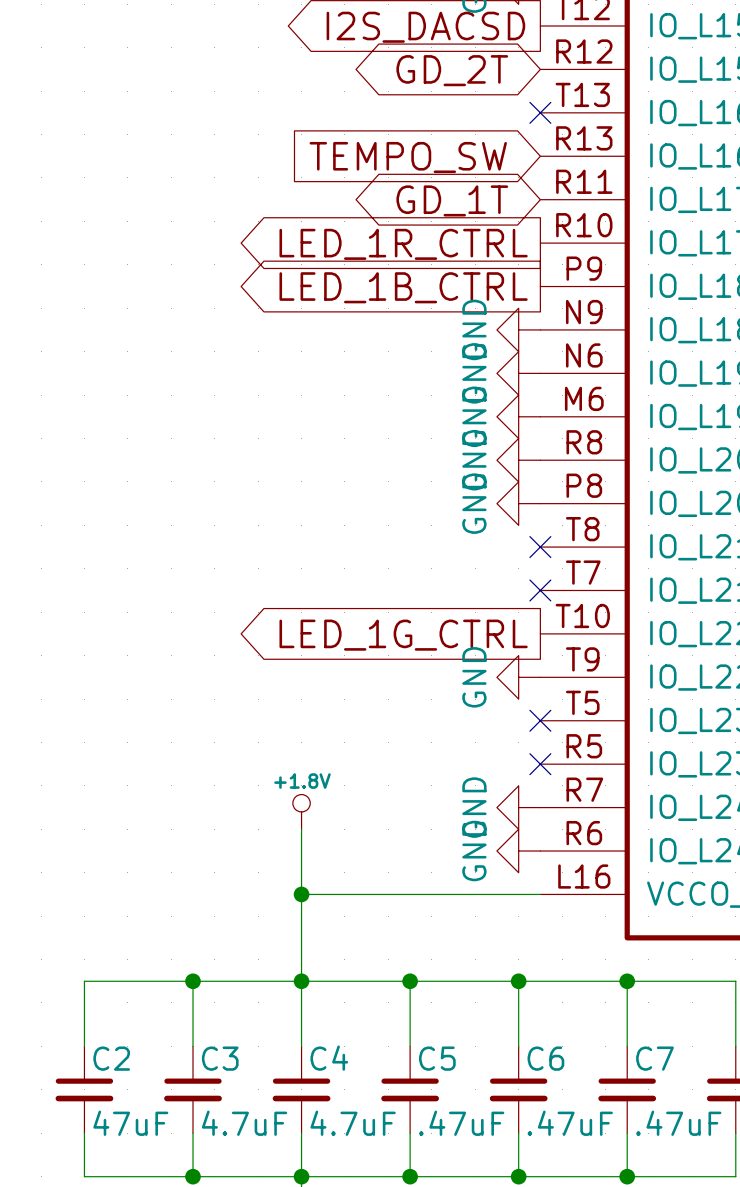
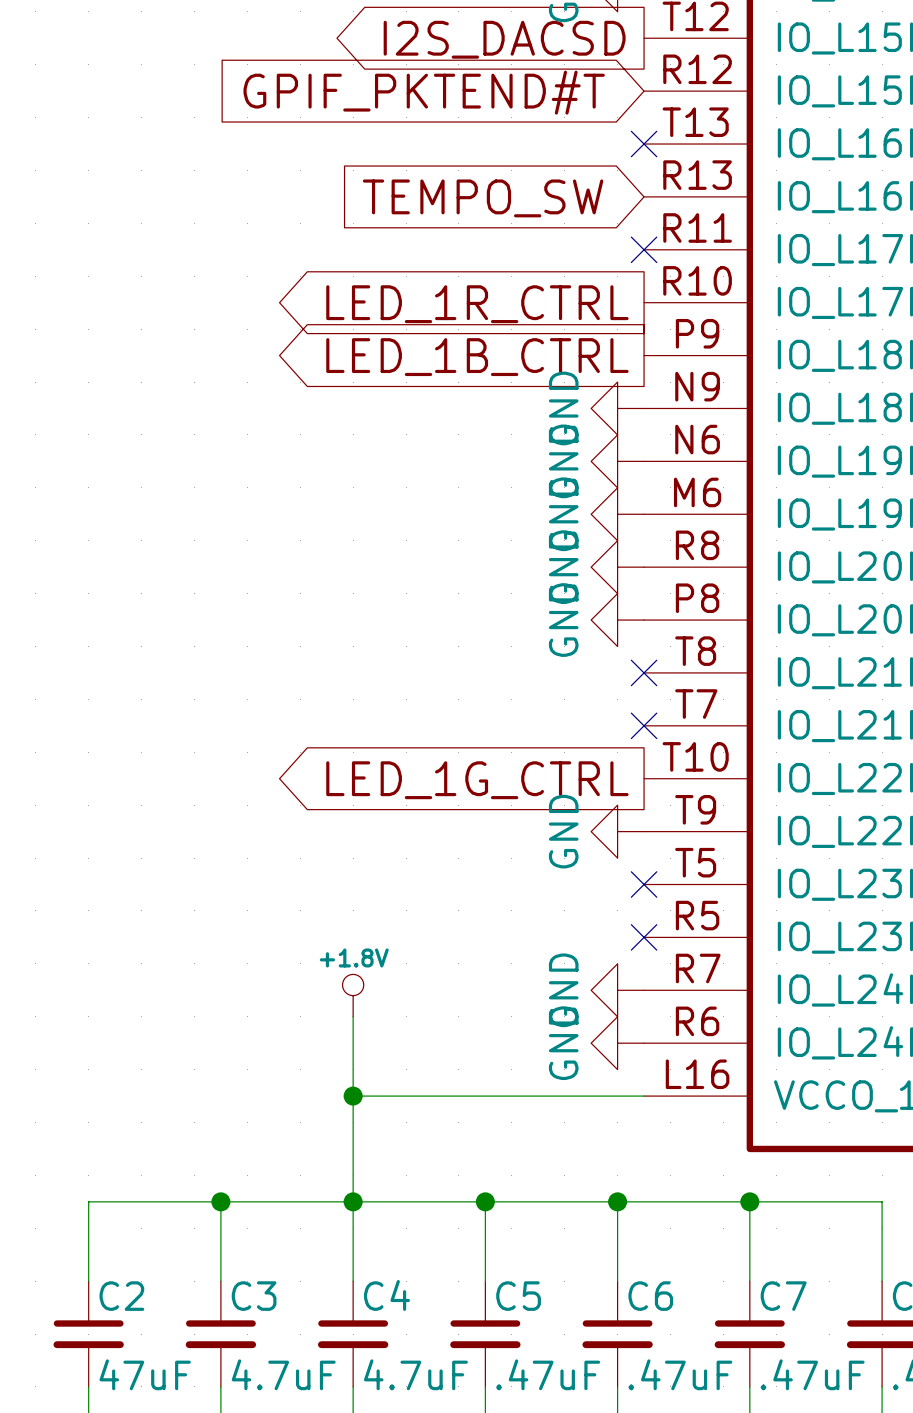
global label shape: bidirectional (452, 70) -> input (424, 92)
global label: GD_2T (452, 70) -> GPIF_PKTEND#T (424, 92)
no-connect mark: none -> (644, 249)
global label: GD_1T (452, 200) -> none

